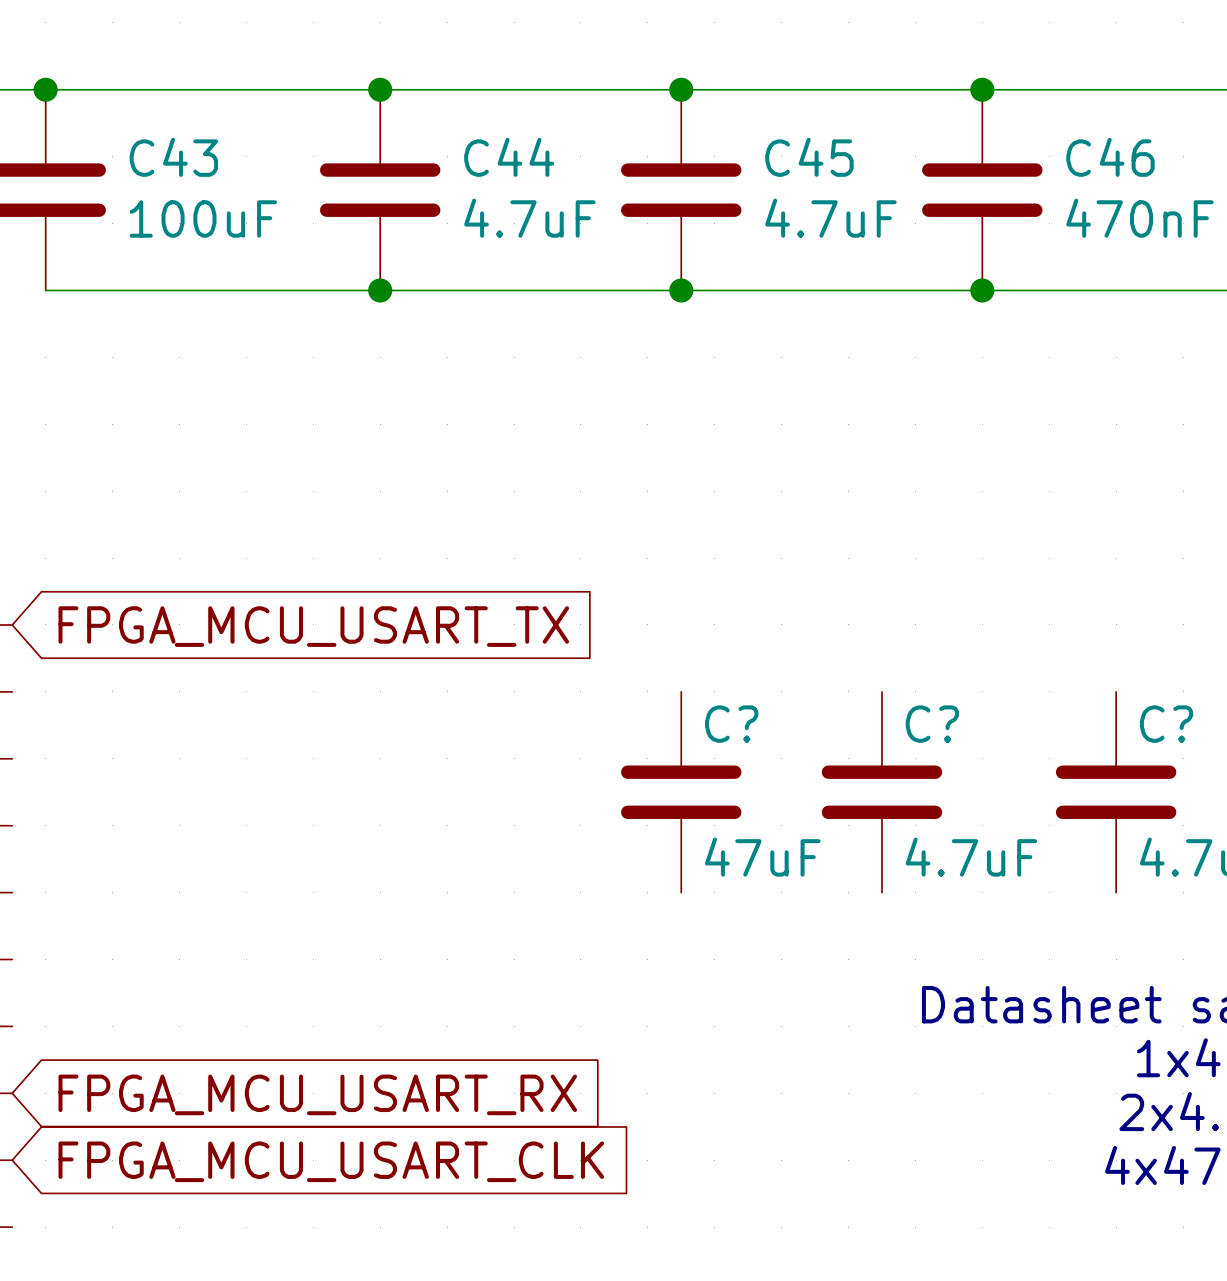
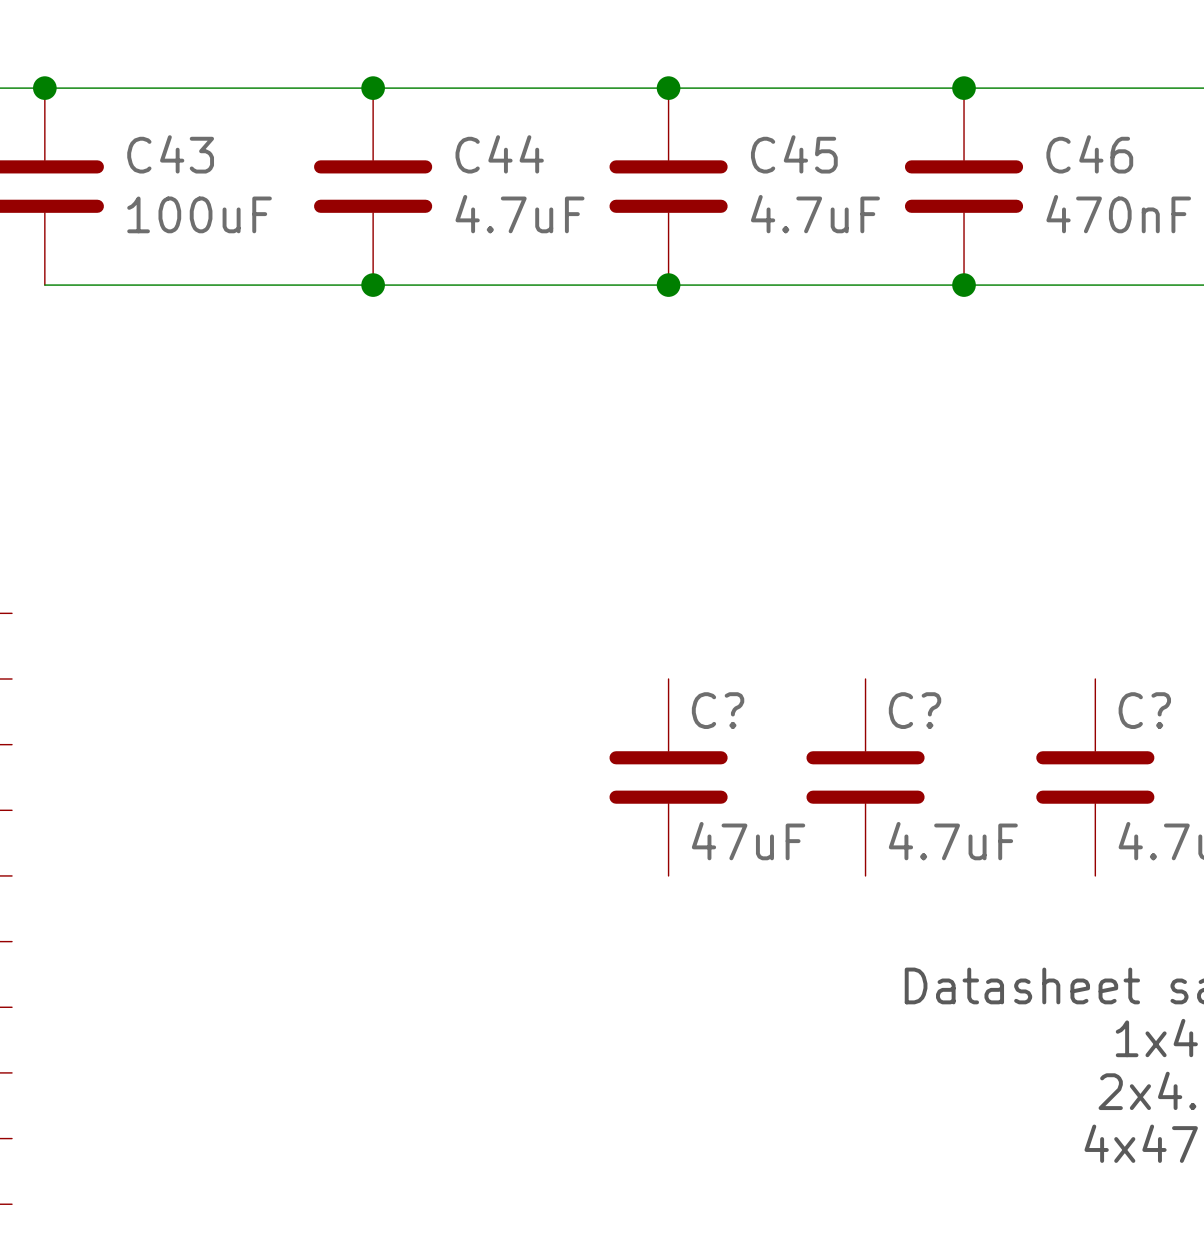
global label: FPGA_MCU_USART_TX (313, 626) -> none
global label: FPGA_MCU_USART_RX (317, 1094) -> none
global label: FPGA_MCU_USART_CLK (331, 1161) -> none

